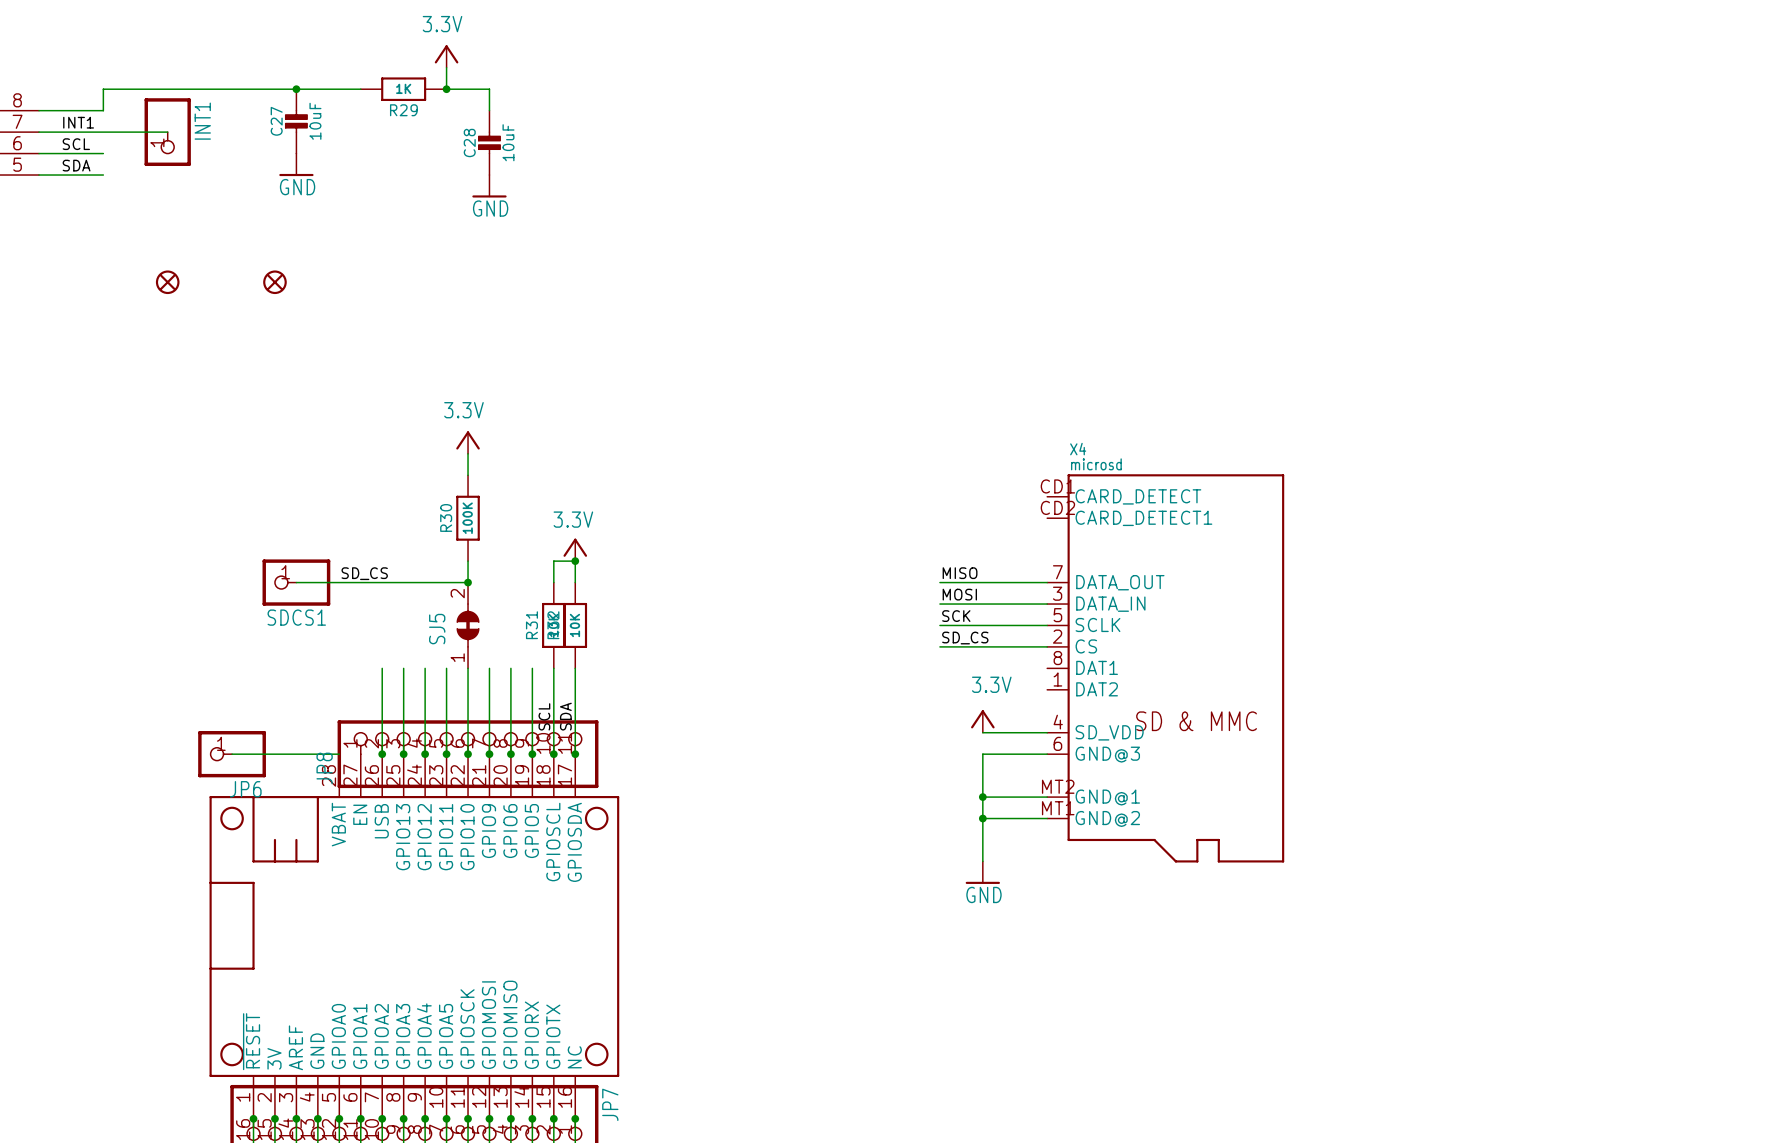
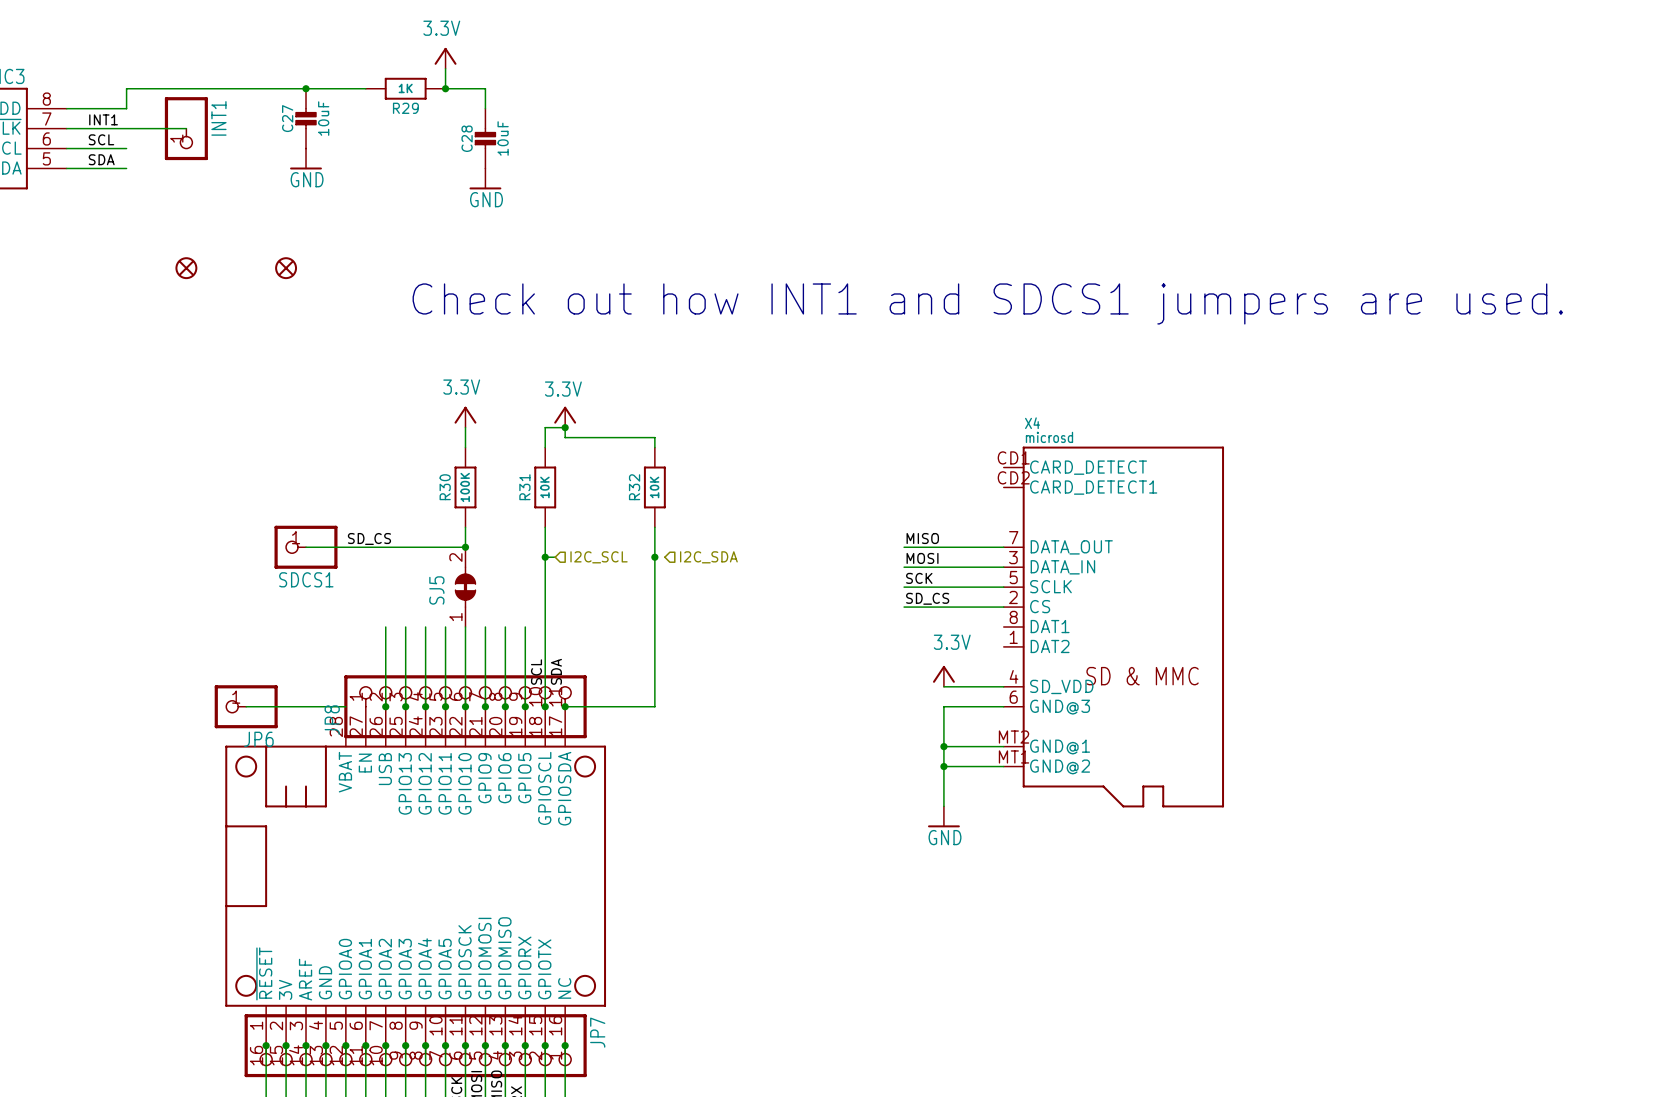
text: none -> Check out how INT1 and SDCS1 jumpers are used. (987, 303)
junction: none -> (565, 427)
wire: none -> (545, 447) (545, 427) (565, 427) (565, 437) (654, 437) (654, 447)
power symbol position: 3.3V (575, 549) -> 3.3V (565, 417)
wire: (553, 561) (575, 561) (575, 582) -> none
junction position: (575, 561) -> (545, 557)
wire: none -> (545, 557) (555, 557)
hierarchical label: none -> I2C_SCL (599, 557)
junction: none -> (654, 557)
hierarchical label: none -> I2C_SDA (708, 557)
R31 position: (553, 625) -> (545, 487)
R32 position: (575, 625) -> (654, 487)
wire: (575, 668) (575, 754) -> (654, 527) (654, 706) (565, 706)

